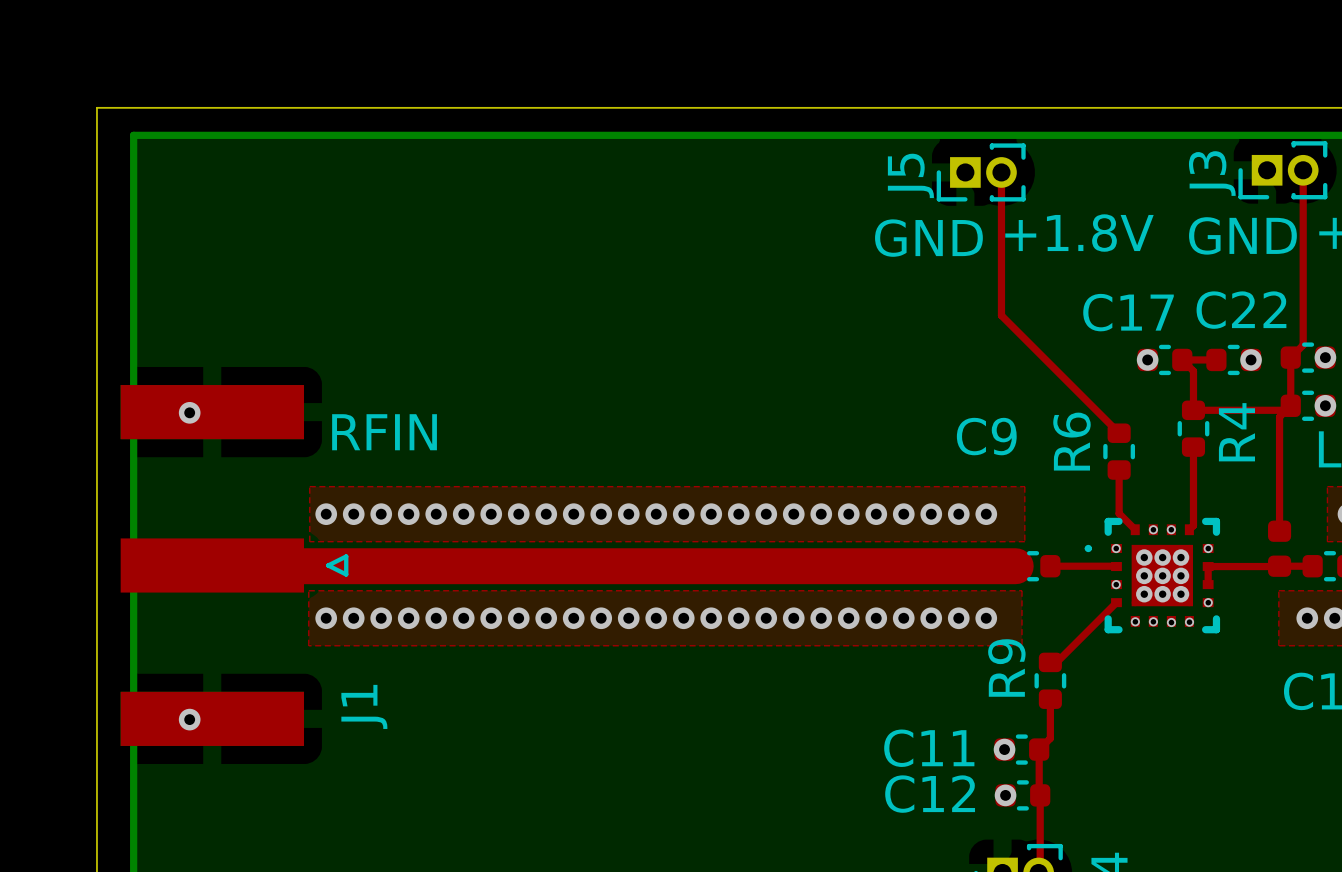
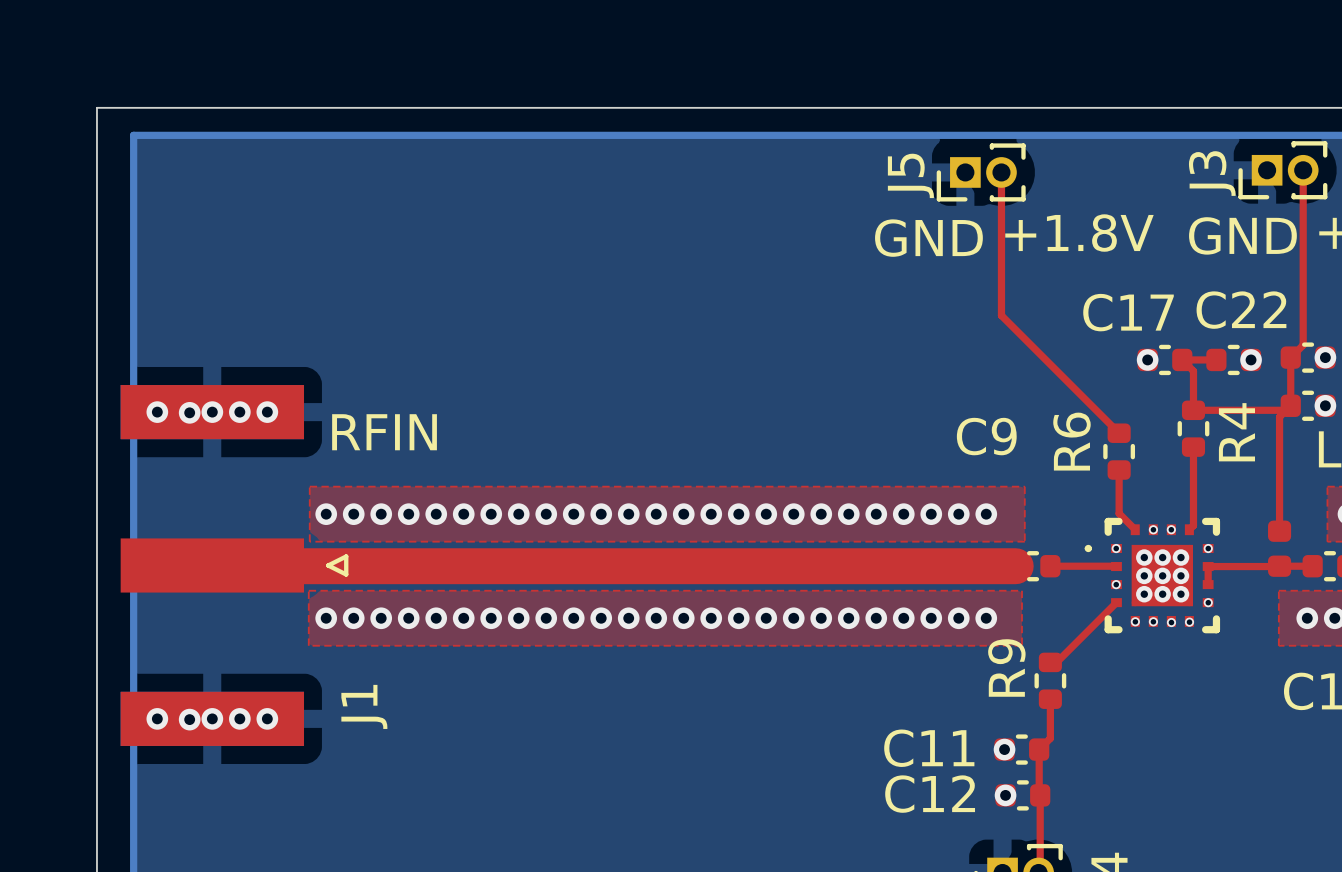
via: none -> (157, 412)
via: none -> (212, 412)
via: none -> (239, 412)
via: none -> (267, 412)
via: none -> (157, 718)
via: none -> (212, 718)
via: none -> (239, 718)
via: none -> (267, 718)

